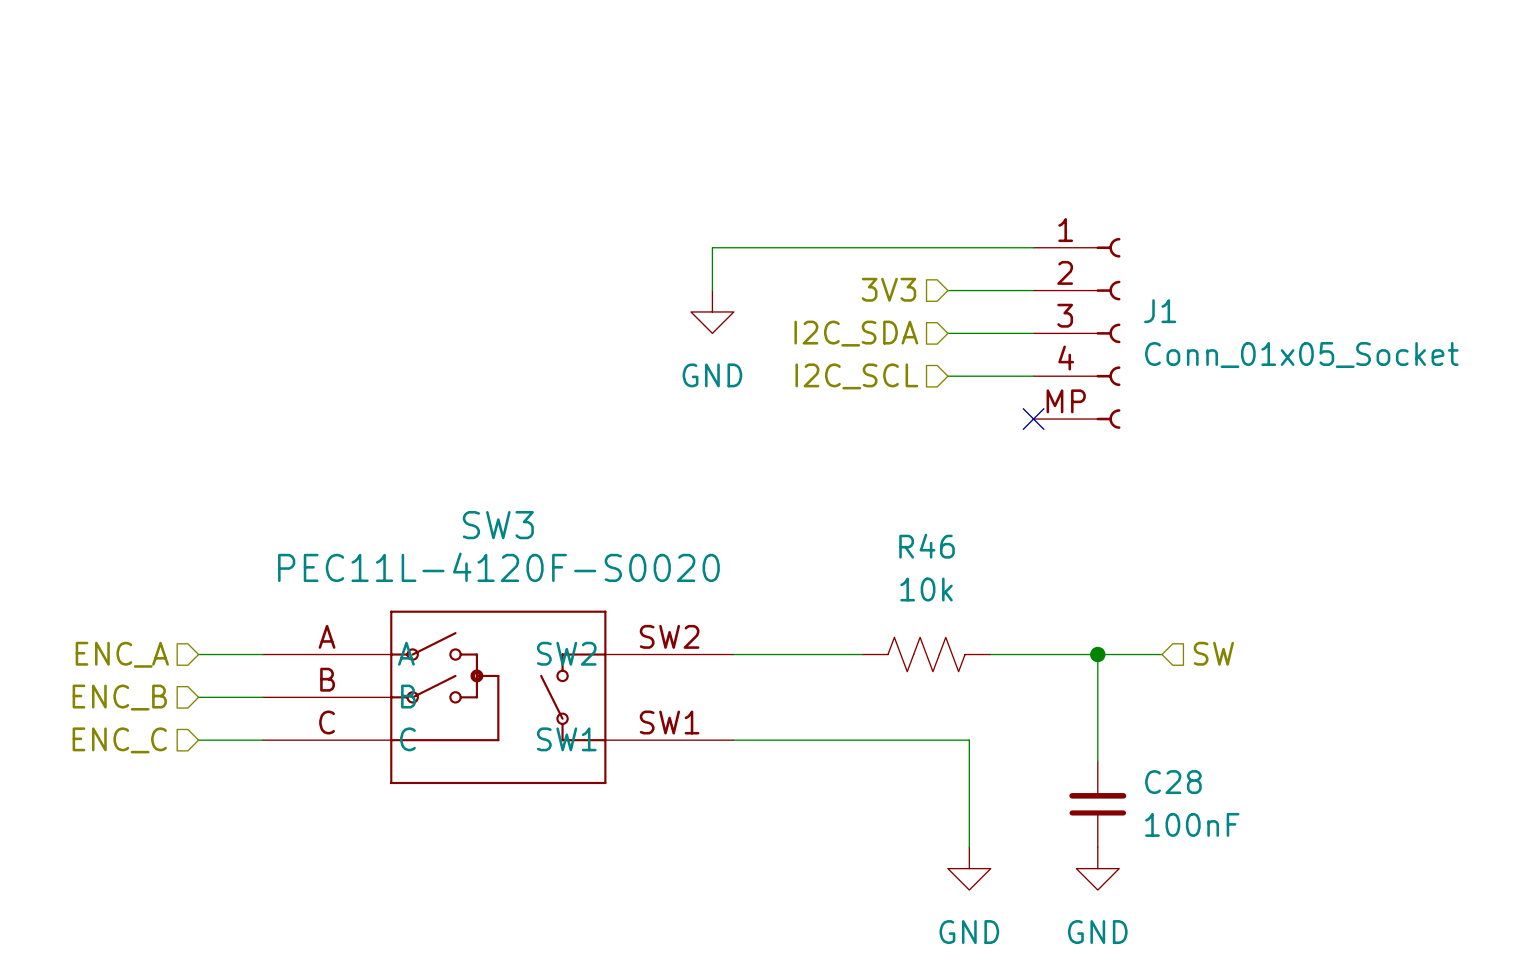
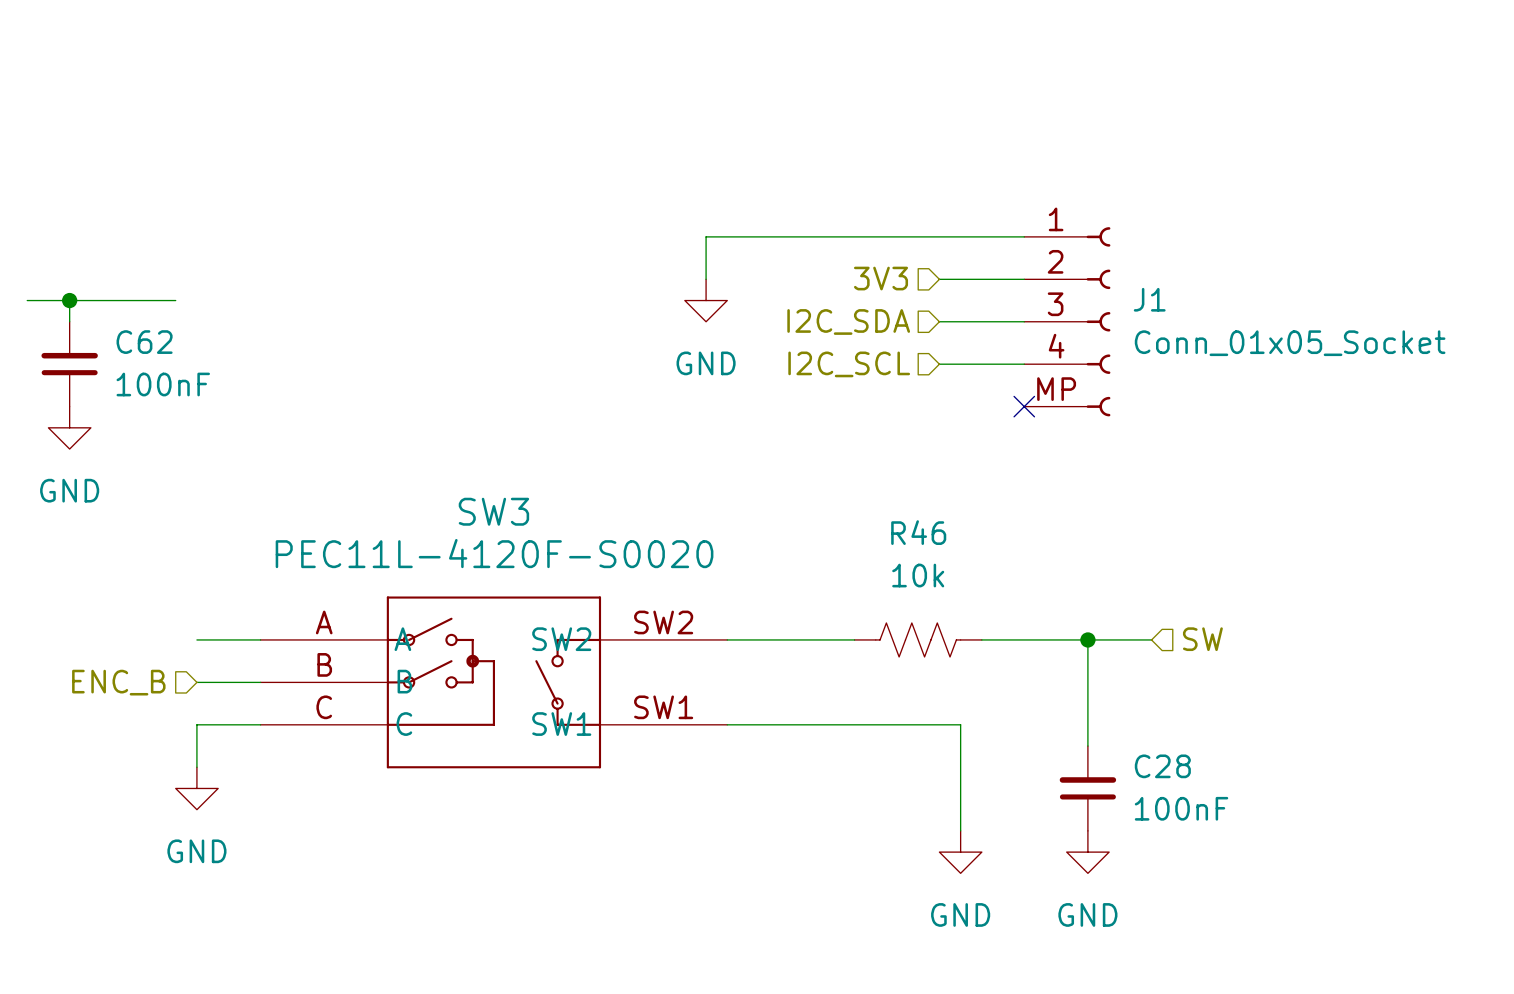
wire: none -> (27, 300) (175, 300)
wire: none -> (69, 300) (69, 321)
junction: none -> (69, 300)
C62: none -> 100nF (69, 364)
power symbol: none -> GND (69, 427)
hierarchical label: ENC_A (122, 654) -> none
hierarchical label: ENC_C (119, 740) -> none
wire: none -> (196, 724) (196, 767)
power symbol: none -> GND (196, 788)

